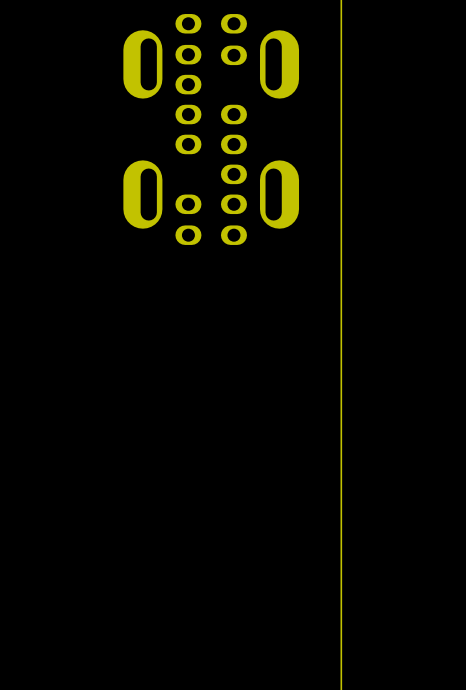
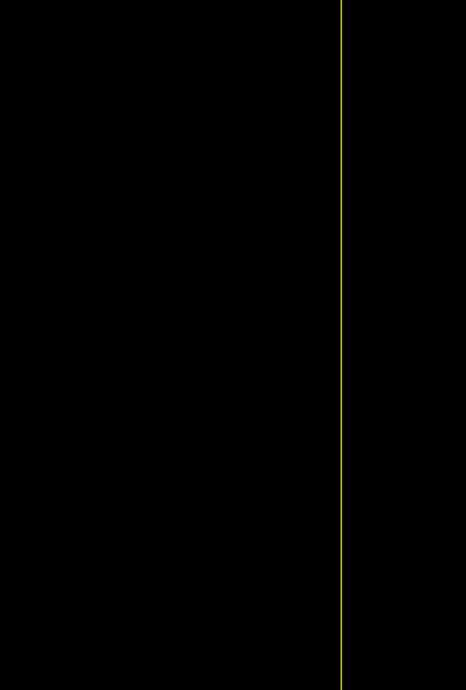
part: (211, 129) -> none

